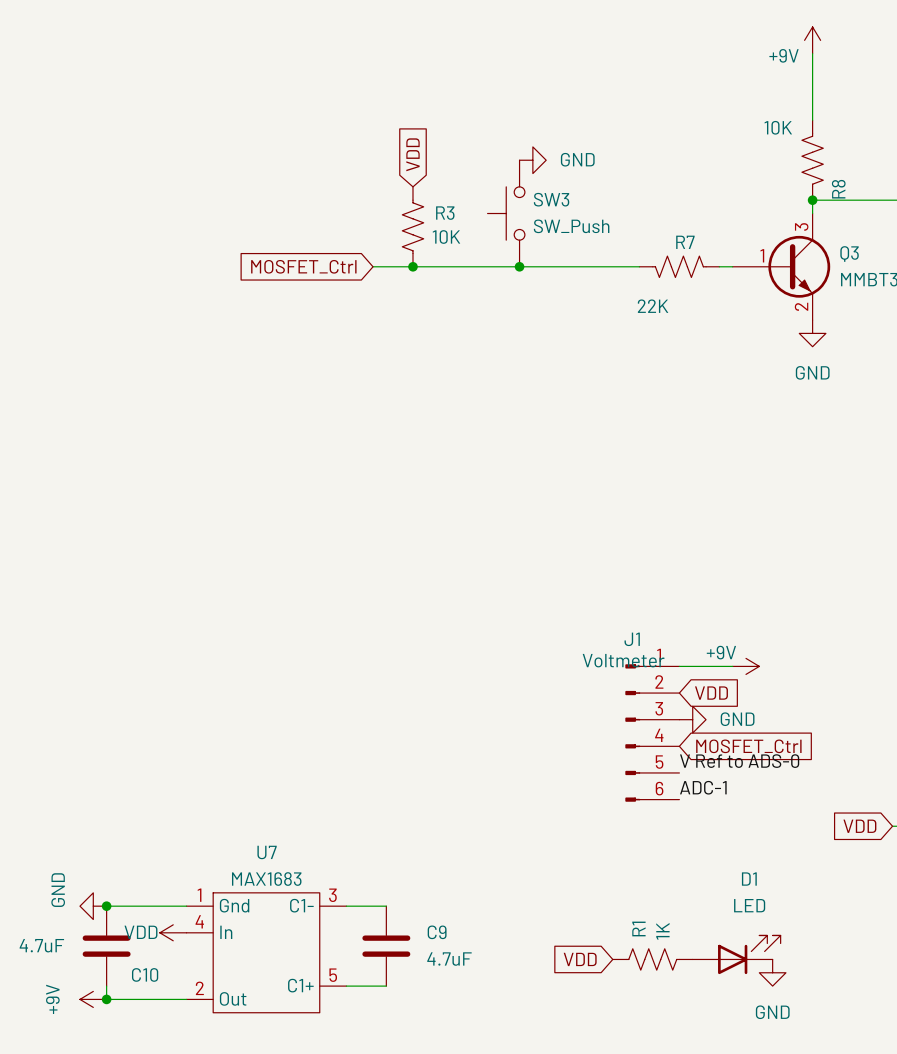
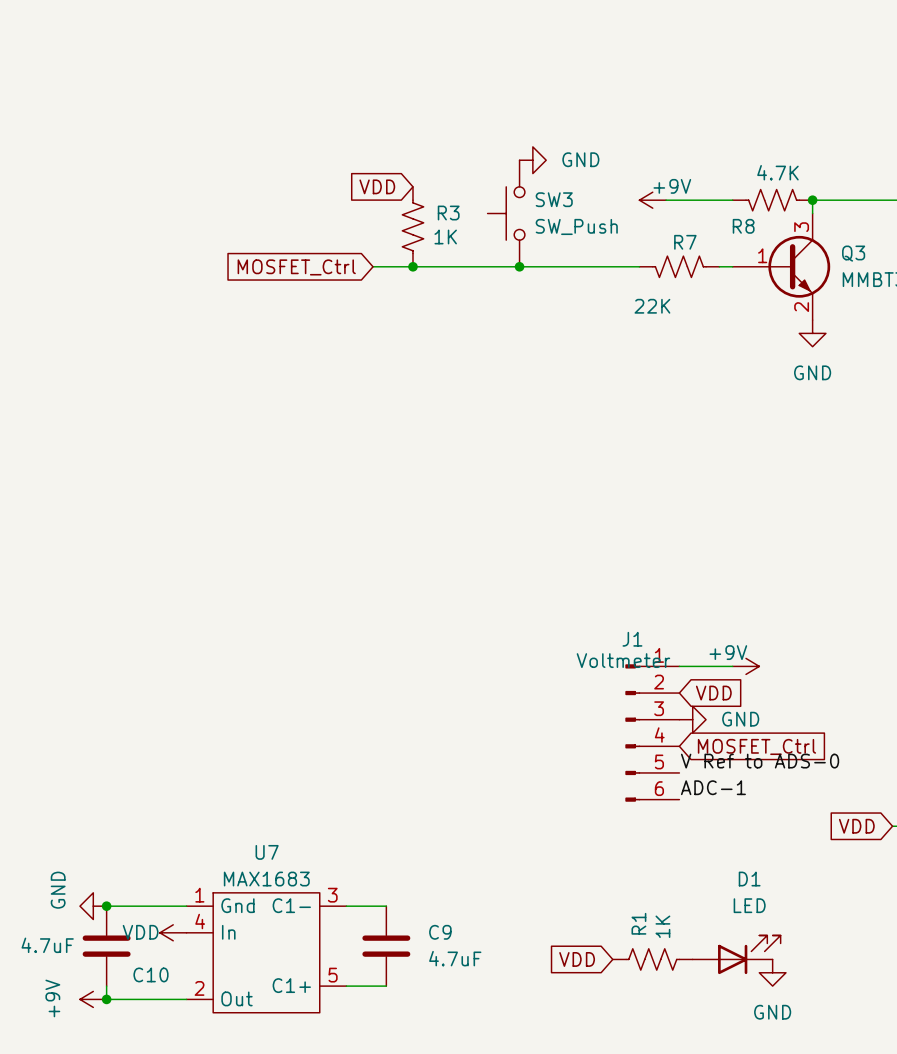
power symbol rotation: 0° (812, 40) -> 90° counterclockwise (652, 200)
power symbol position: +9V (812, 40) -> +9V (652, 200)
wire: (812, 53) (812, 120) -> none
power symbol text position: +9V (784, 55) -> +9V (672, 186)
R8 value: 10K (778, 127) -> 4.7K (777, 172)
global label rotation: 0° (412, 154) -> 90° counterclockwise (377, 186)
R8 rotation: 0° (812, 160) -> 90° clockwise (772, 200)
R8 position: (812, 160) -> (772, 200)
wire: none -> (666, 200) (732, 200)
R3 value: 10K (446, 237) -> 1K (445, 236)

